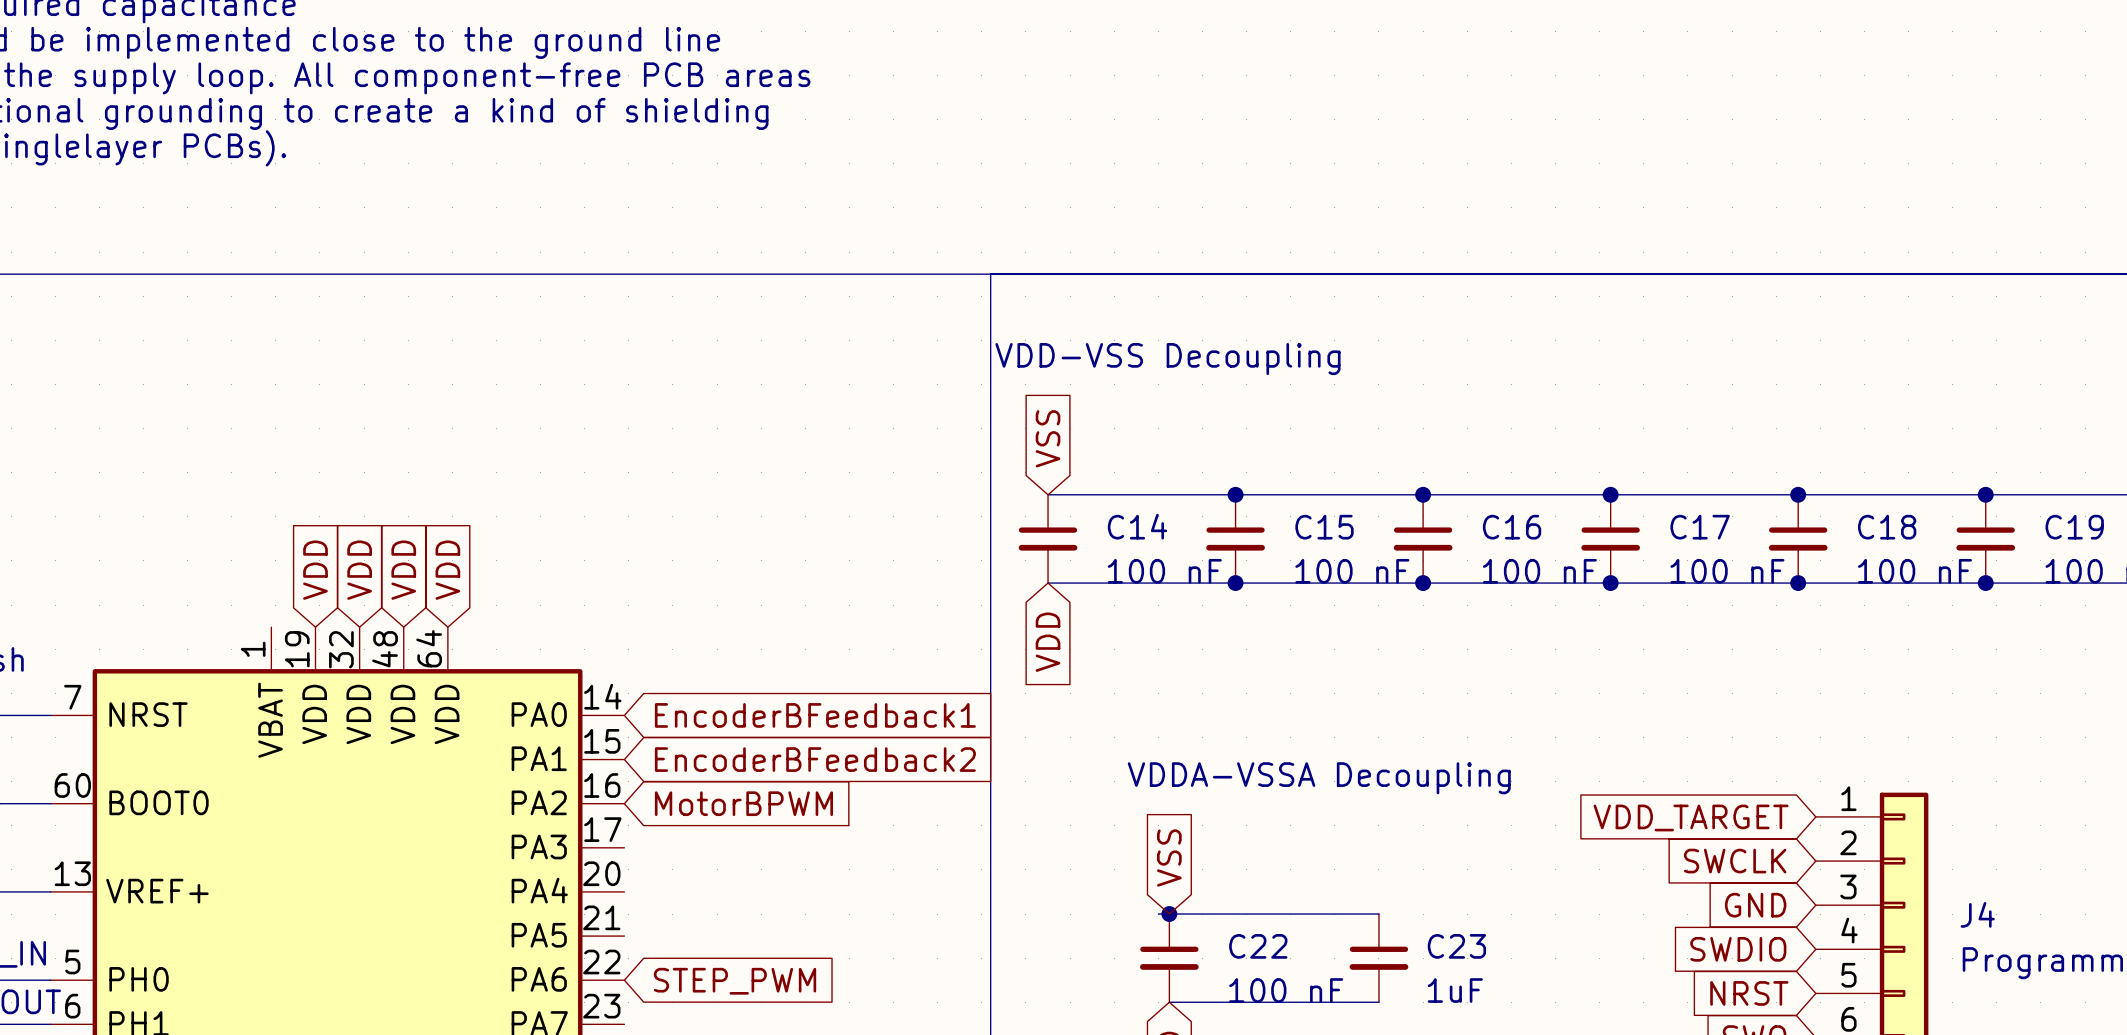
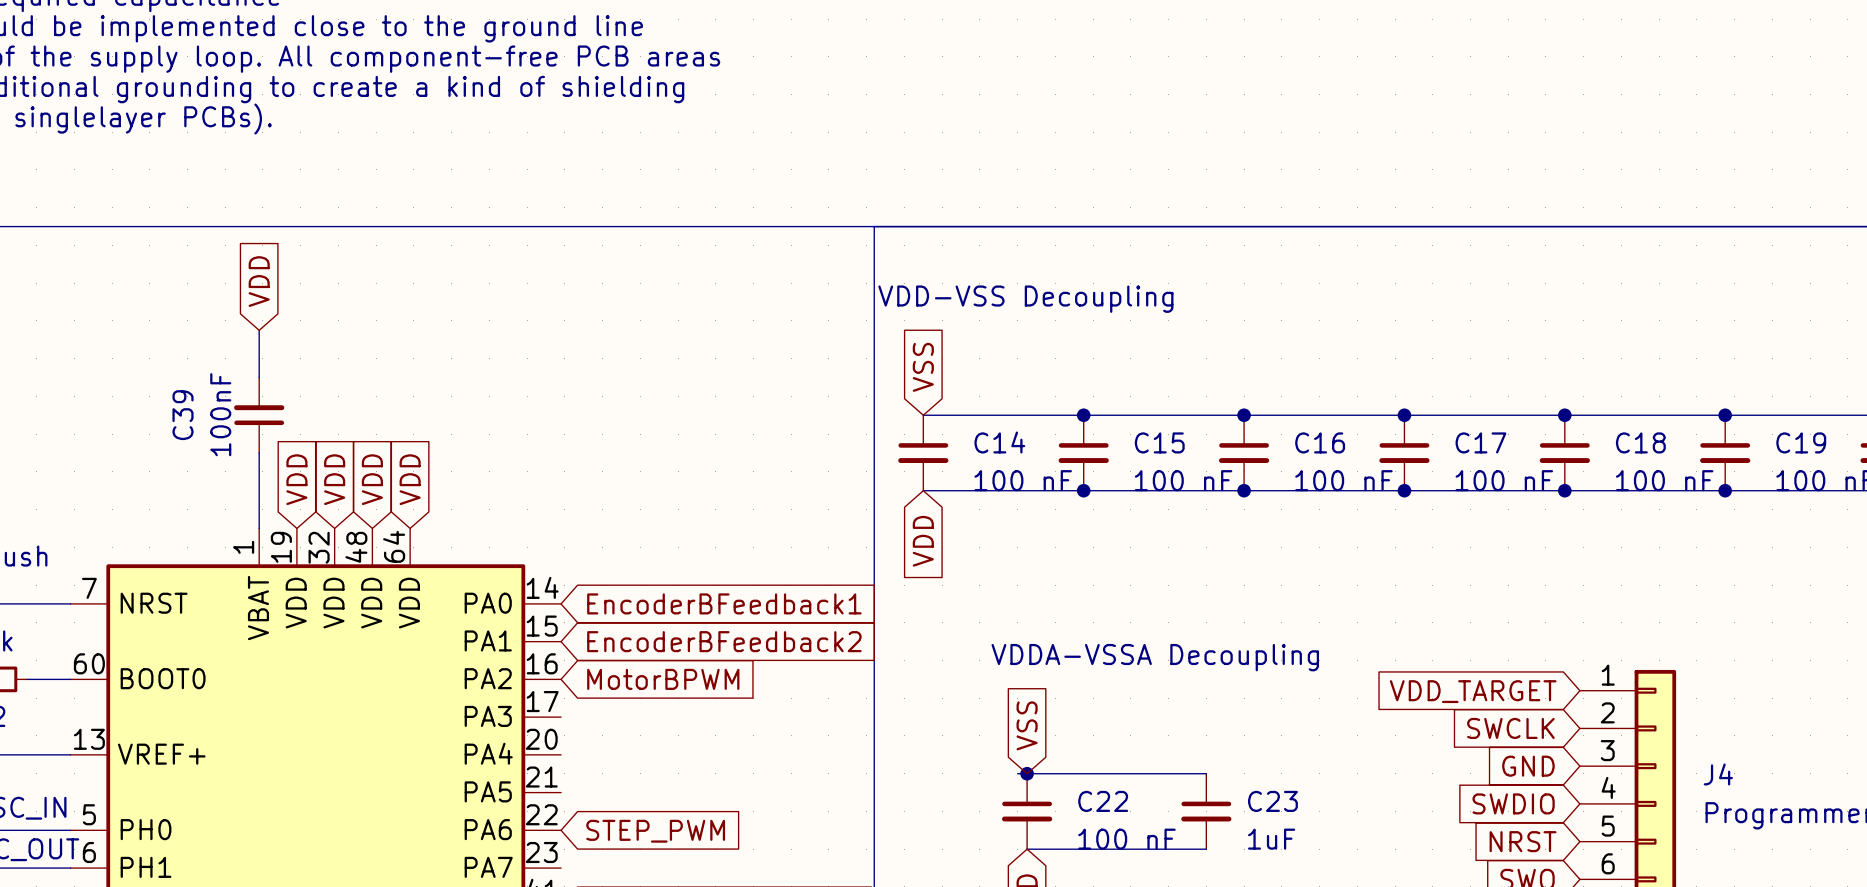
global label: none -> VDD (259, 281)
wire: none -> (259, 330) (259, 377)
C39: none -> 100nF (259, 415)
wire: none -> (259, 452) (259, 528)

